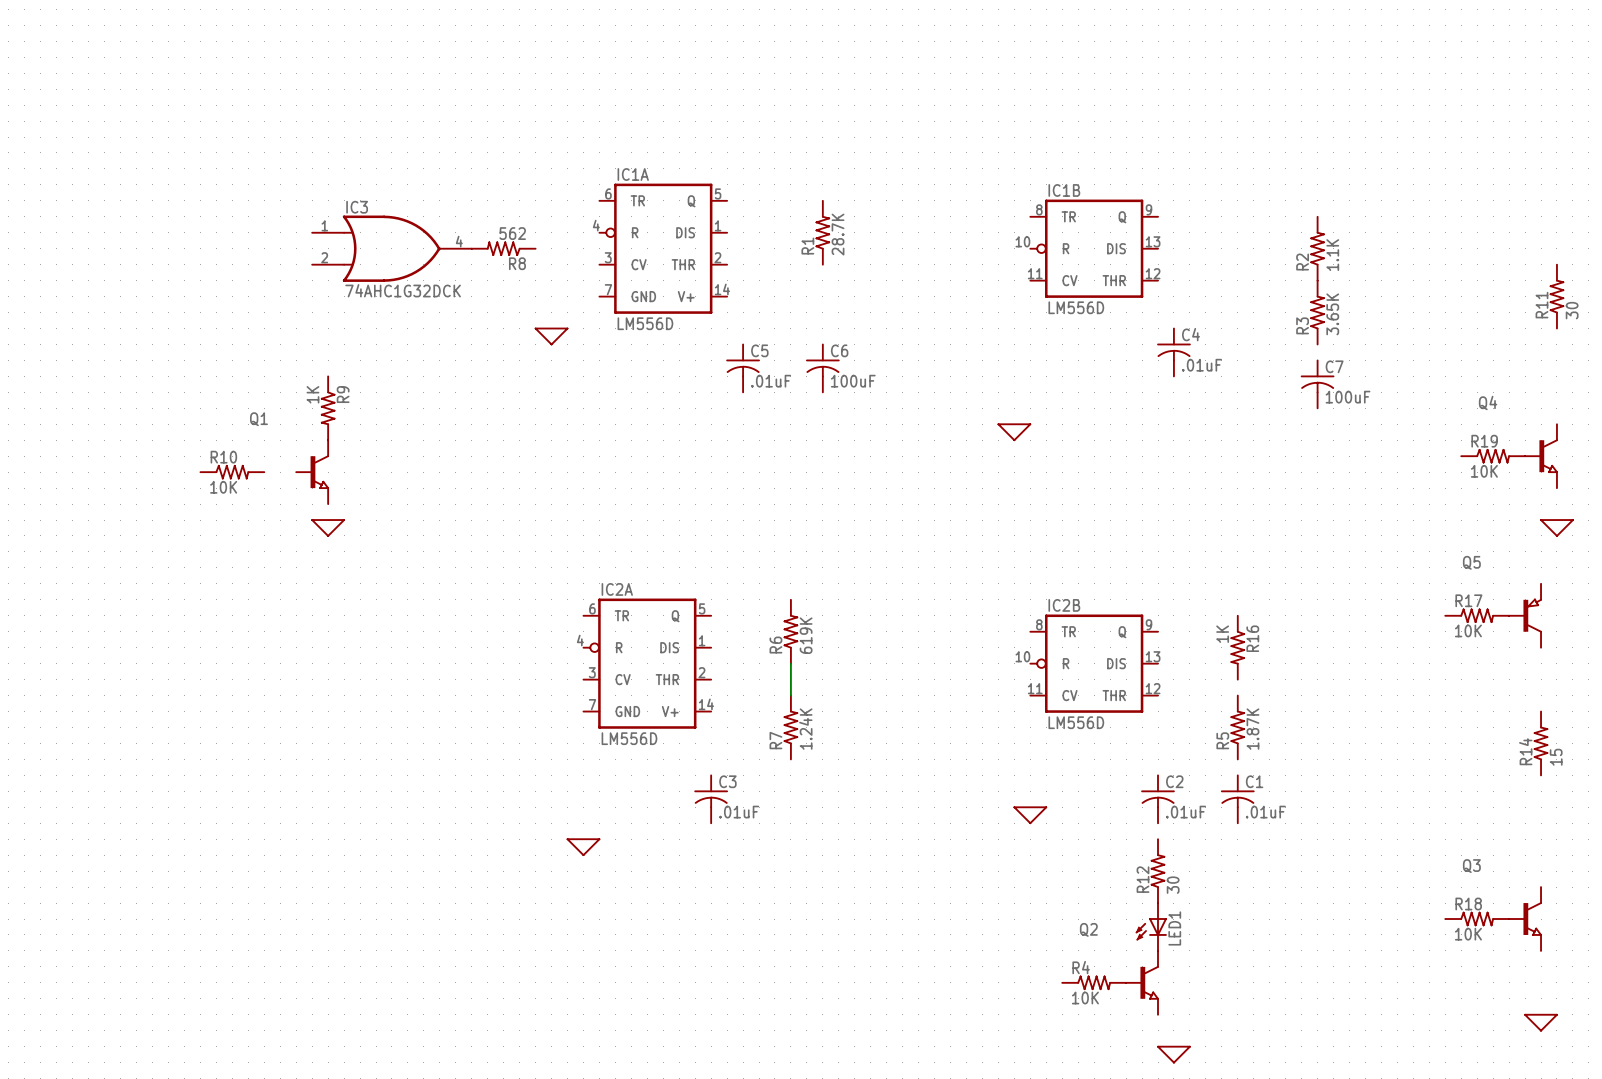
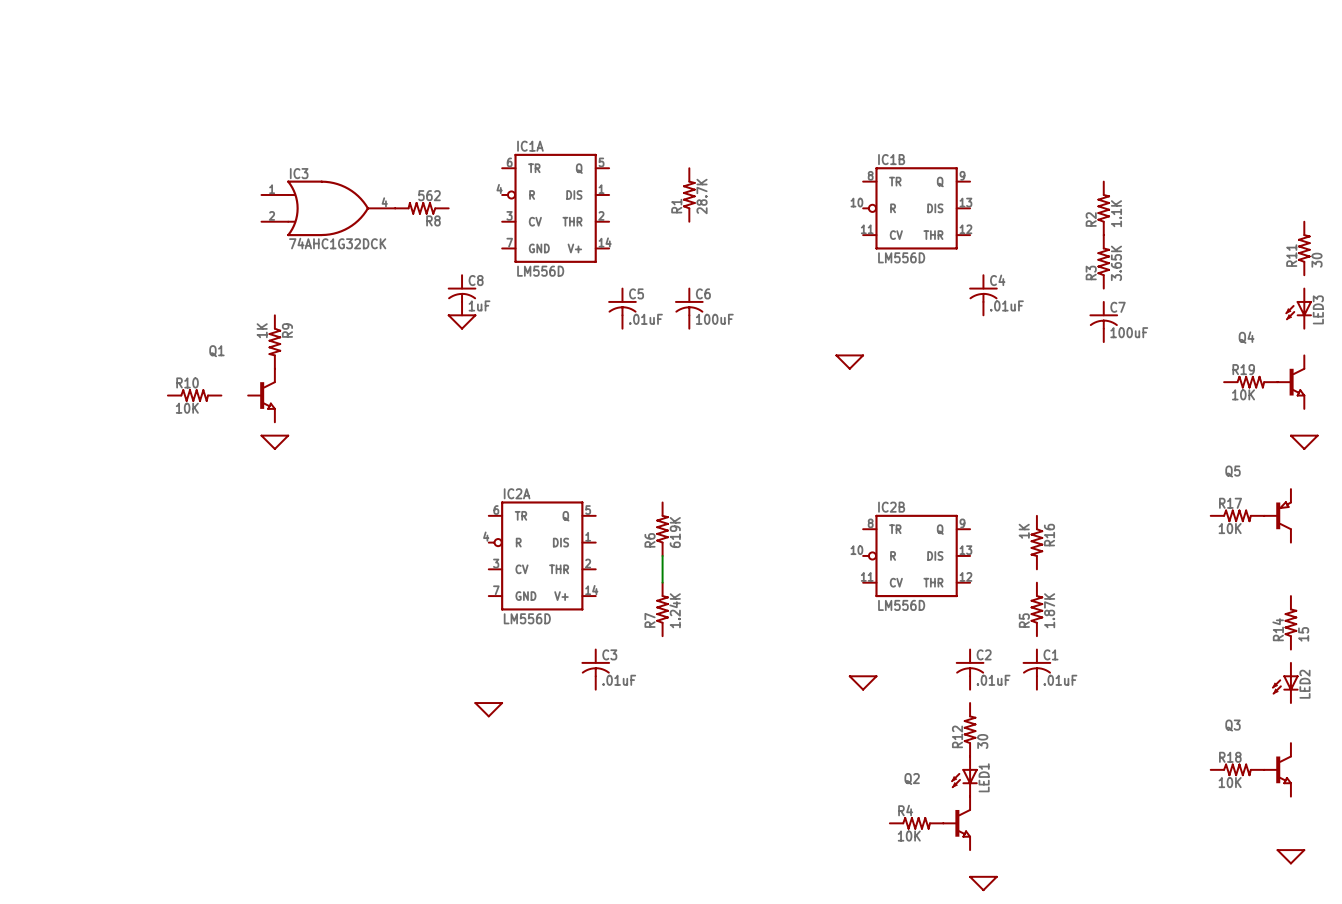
power symbol position: (551, 336) -> (462, 322)
C8: none -> 1uF (462, 295)
LED3: none -> (1298, 308)
LED2: none -> (1285, 682)

